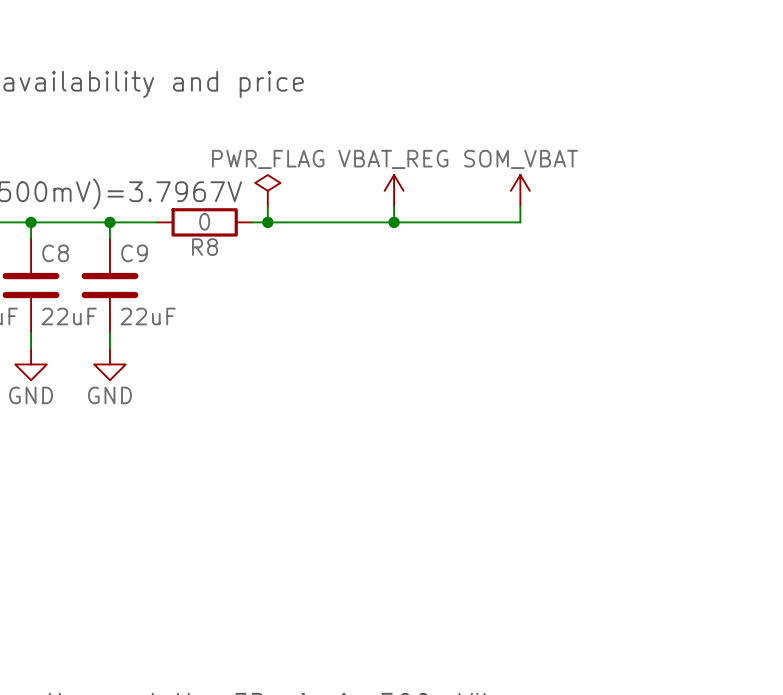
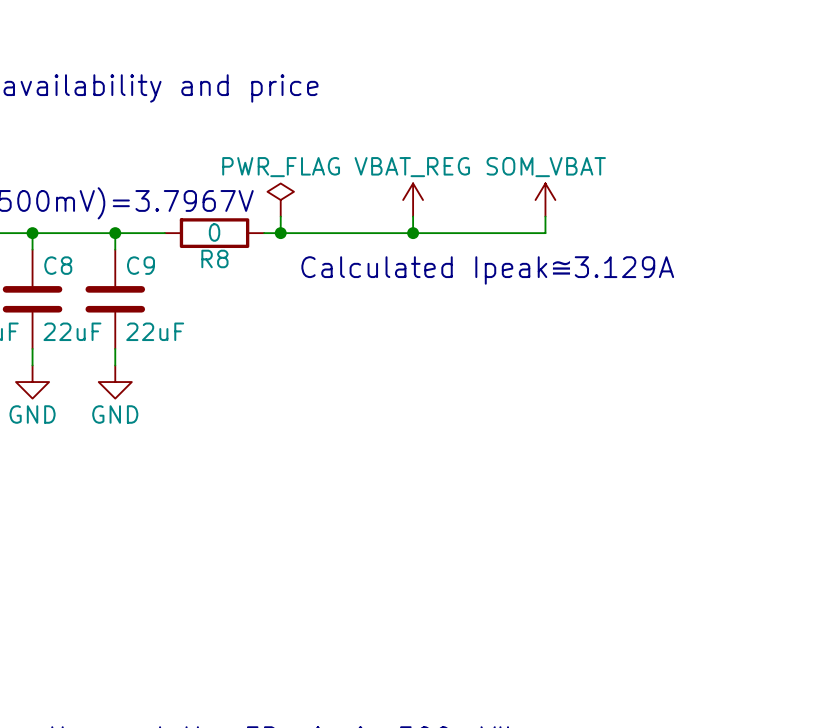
text: none -> Calculated Ipeak≅3.129A (487, 270)

